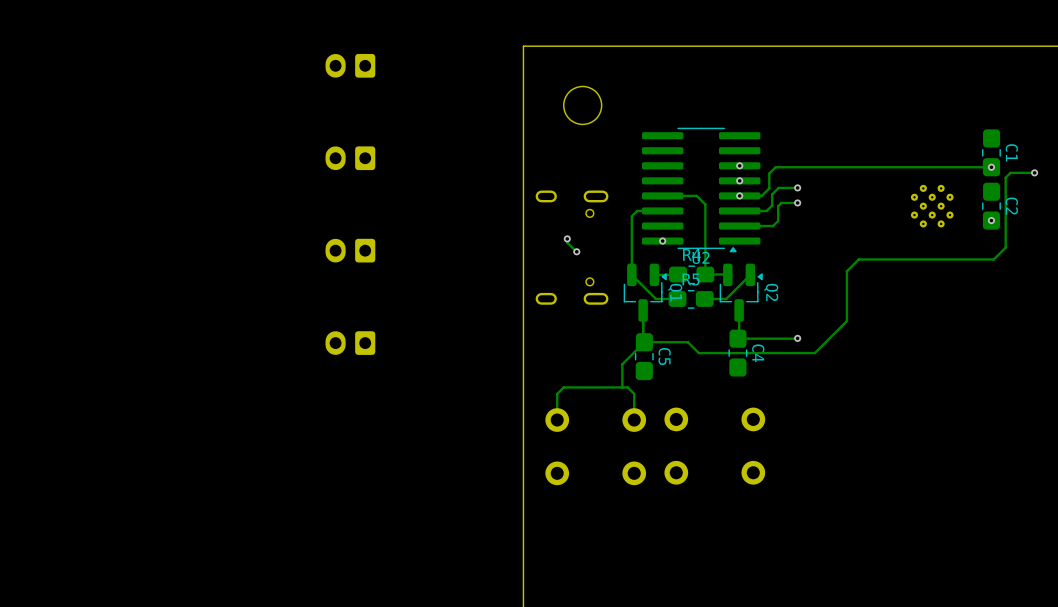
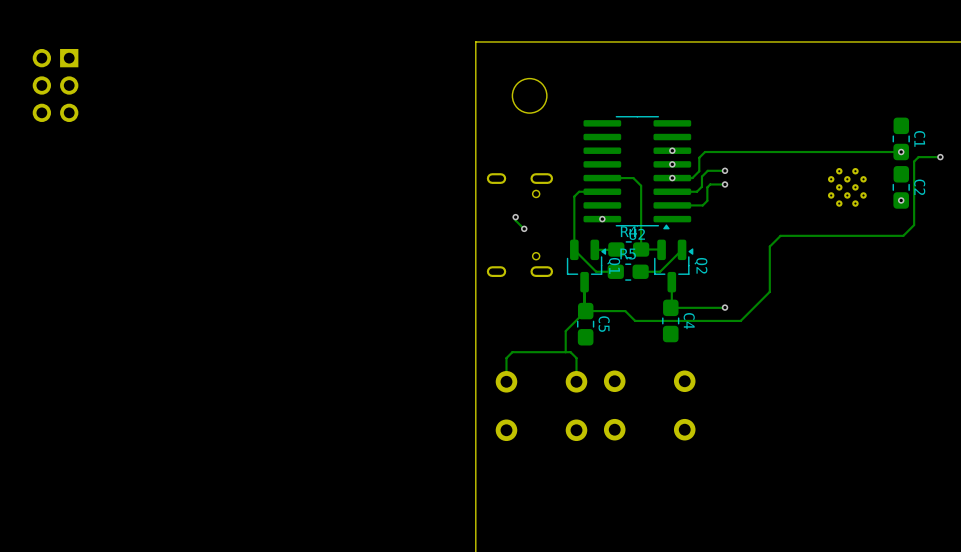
part: (350, 65) -> none
part: none -> (55, 85)
part: (350, 158) -> none
part: (350, 250) -> none
part: (350, 343) -> none

